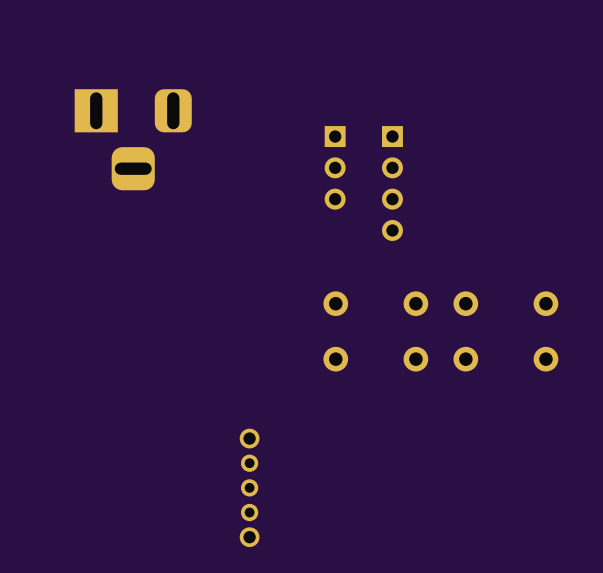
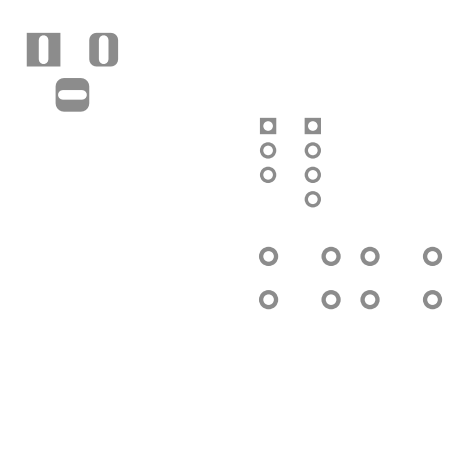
part position: (133, 139) -> (72, 72)
part: (249, 487) -> none

